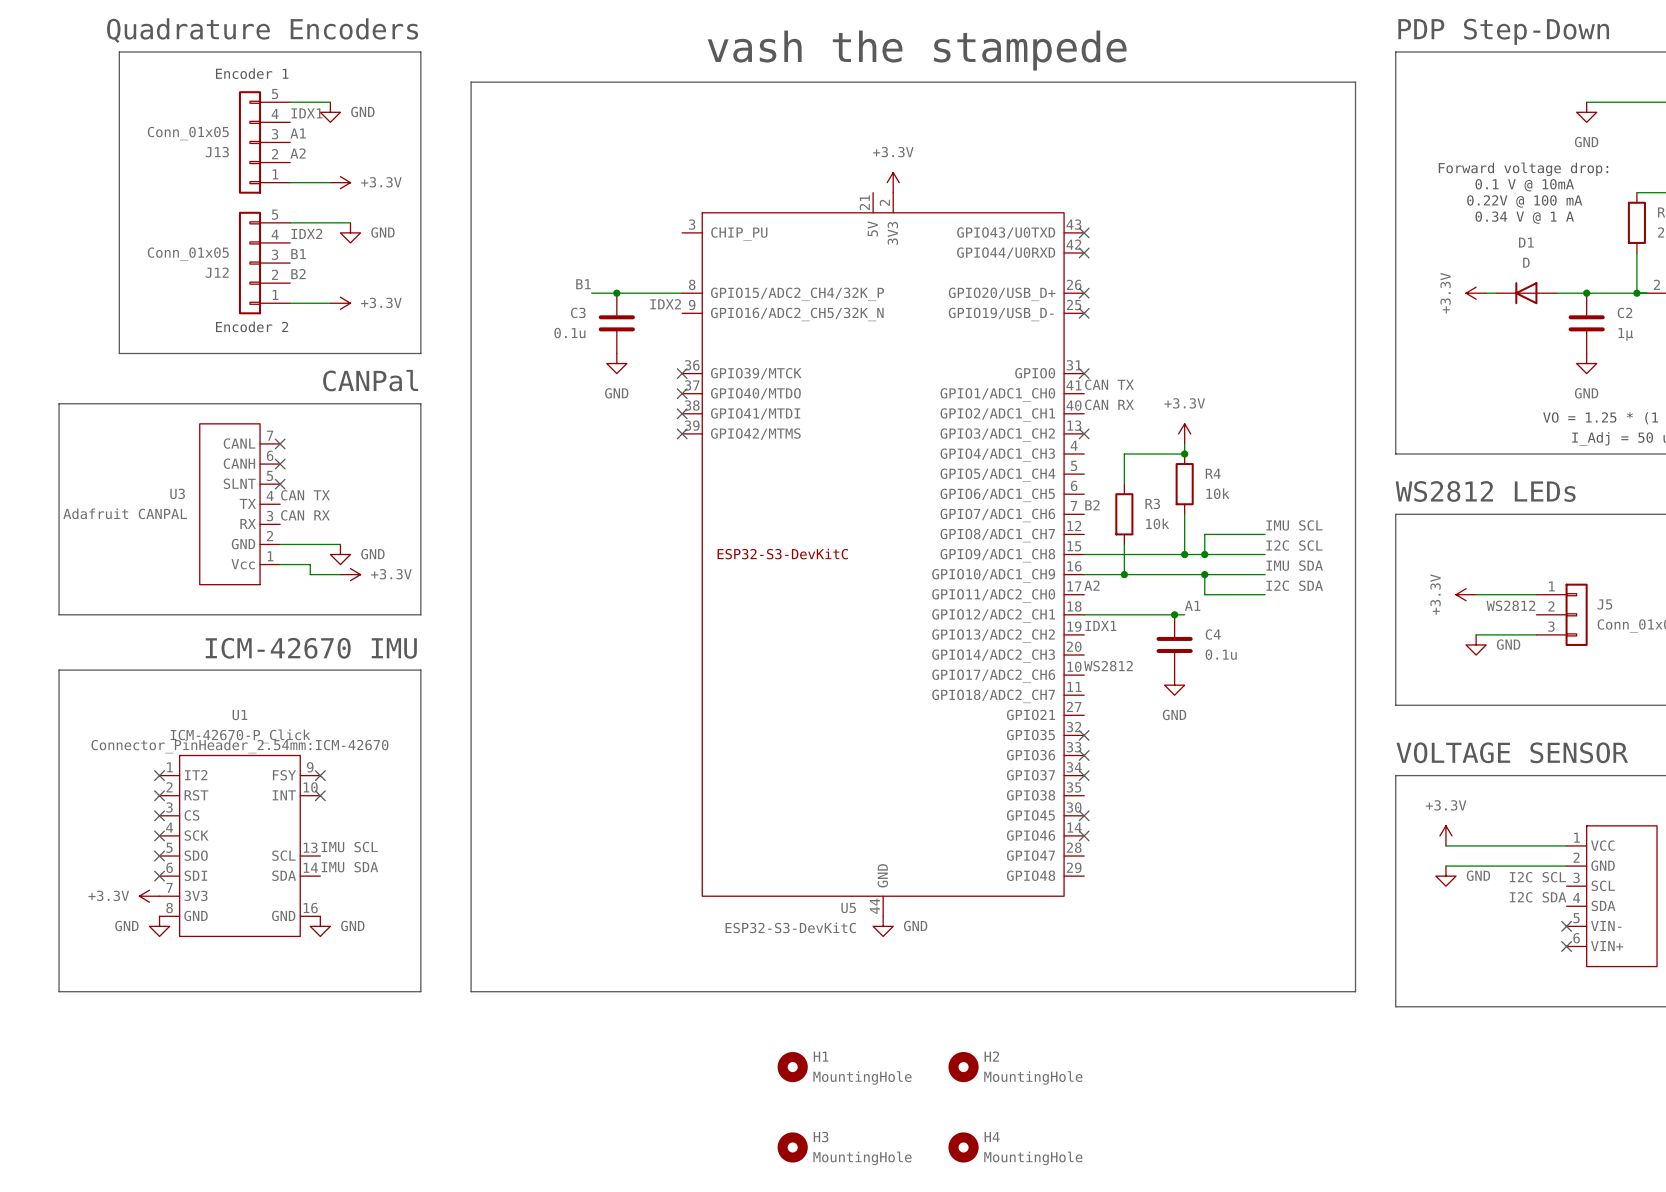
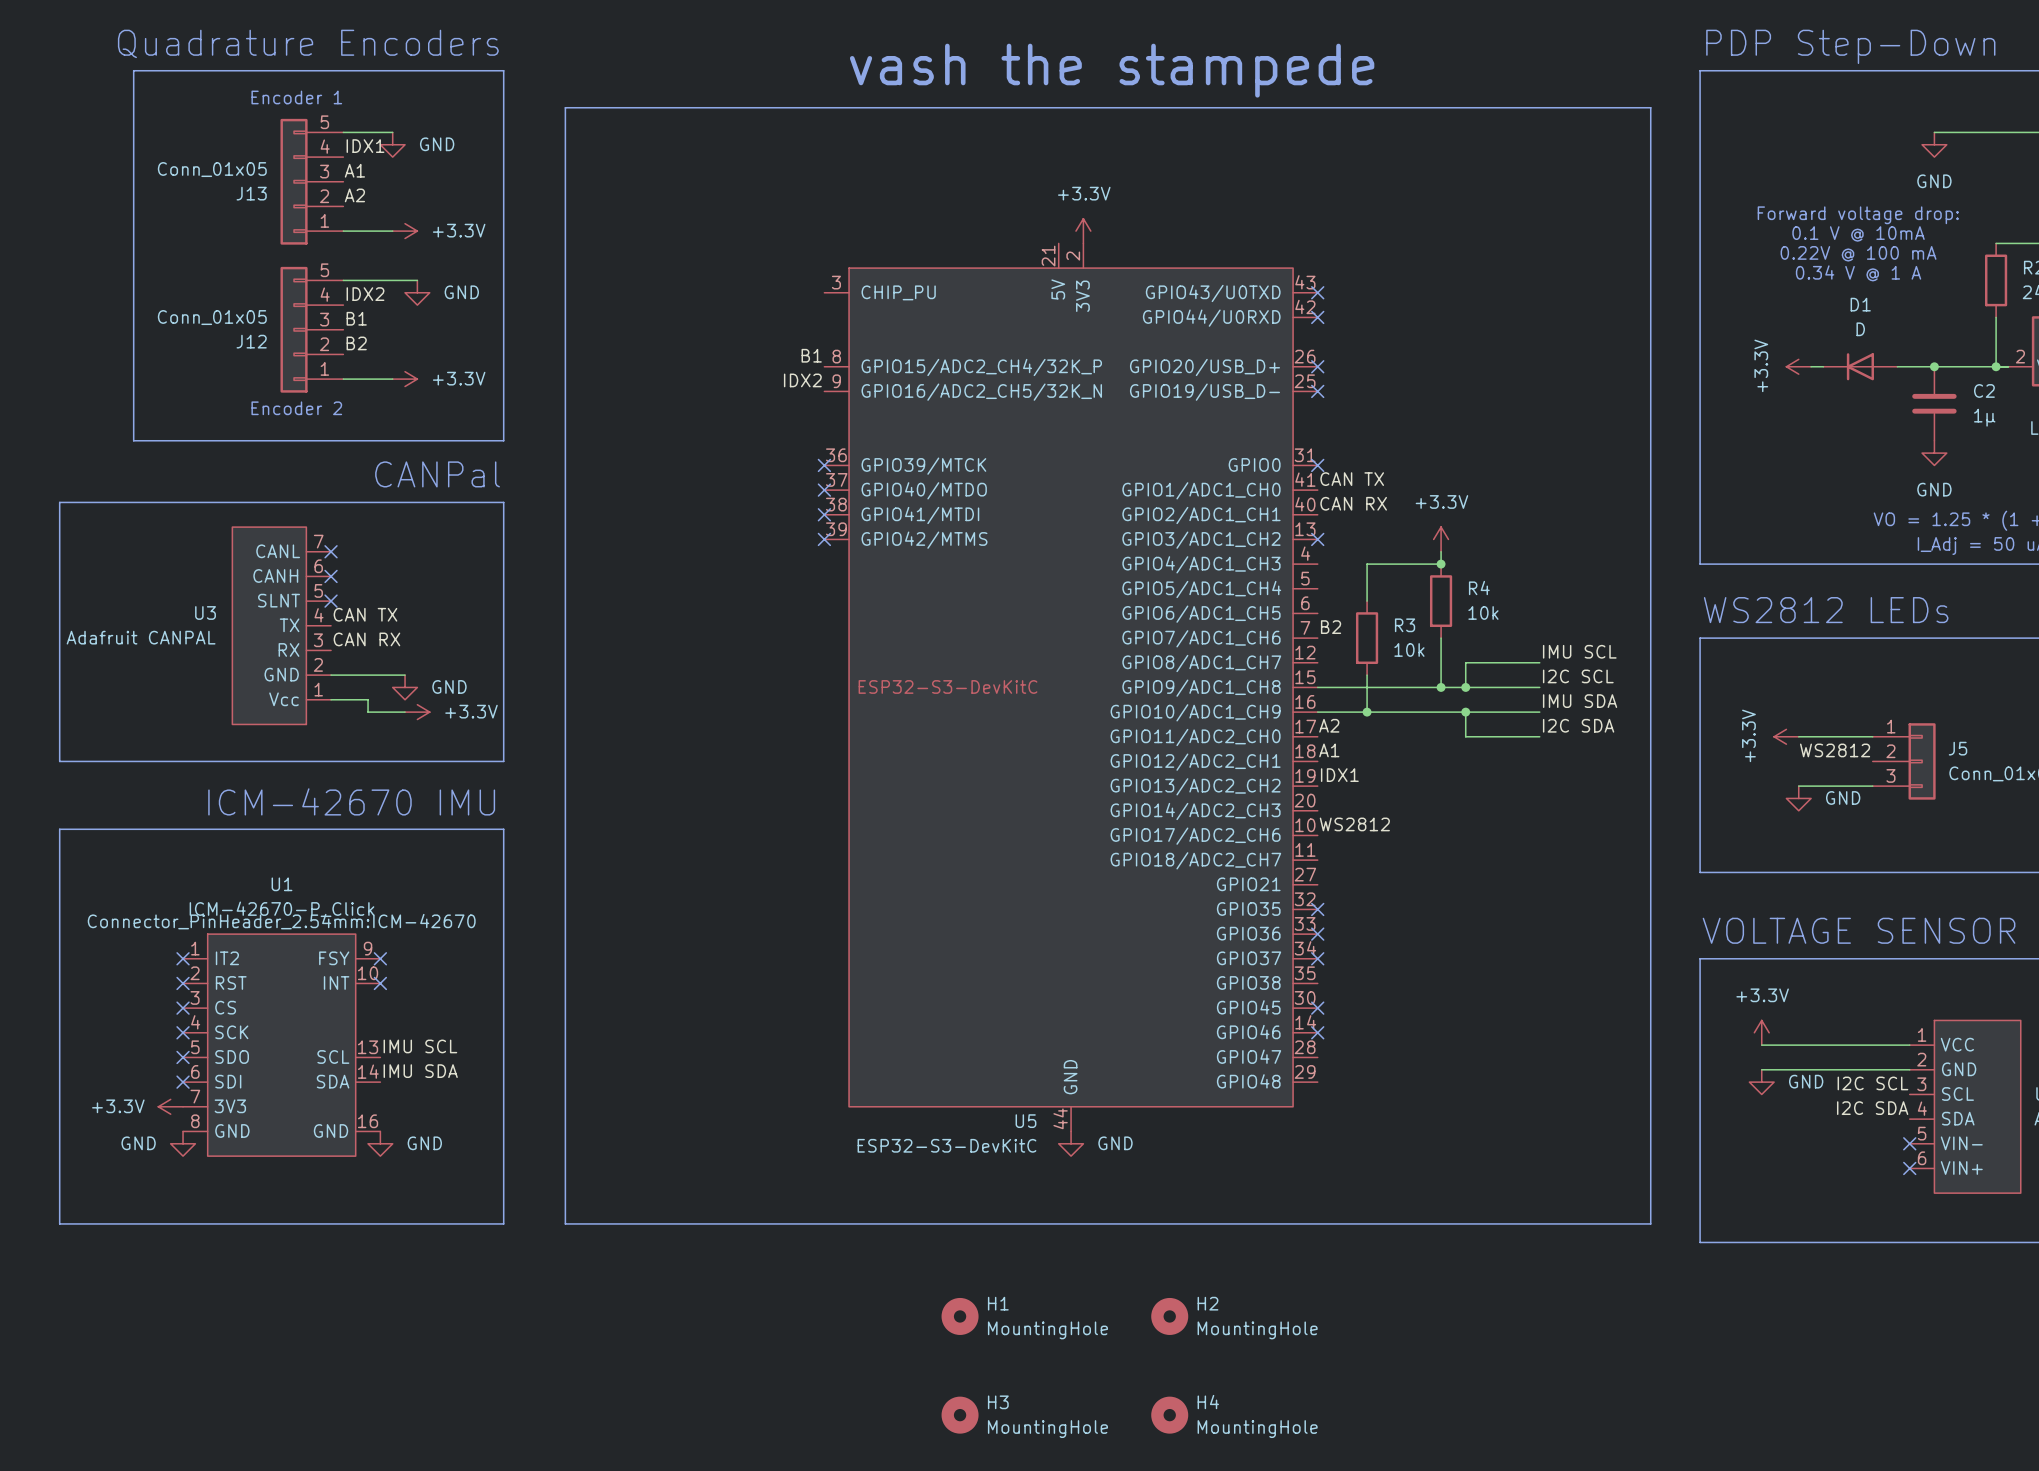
label position: B1 (583, 284) -> B1 (811, 355)
wire: (591, 293) (682, 293) -> none
junction: (616, 293) -> none
C3: 0.1u (616, 323) -> none
power symbol: GND (616, 363) -> none
label position: A1 (1192, 605) -> A1 (1329, 750)
wire: (1084, 614) (1184, 614) -> none
junction: (1174, 614) -> none
C4: 0.1u (1174, 644) -> none
power symbol: GND (1174, 685) -> none

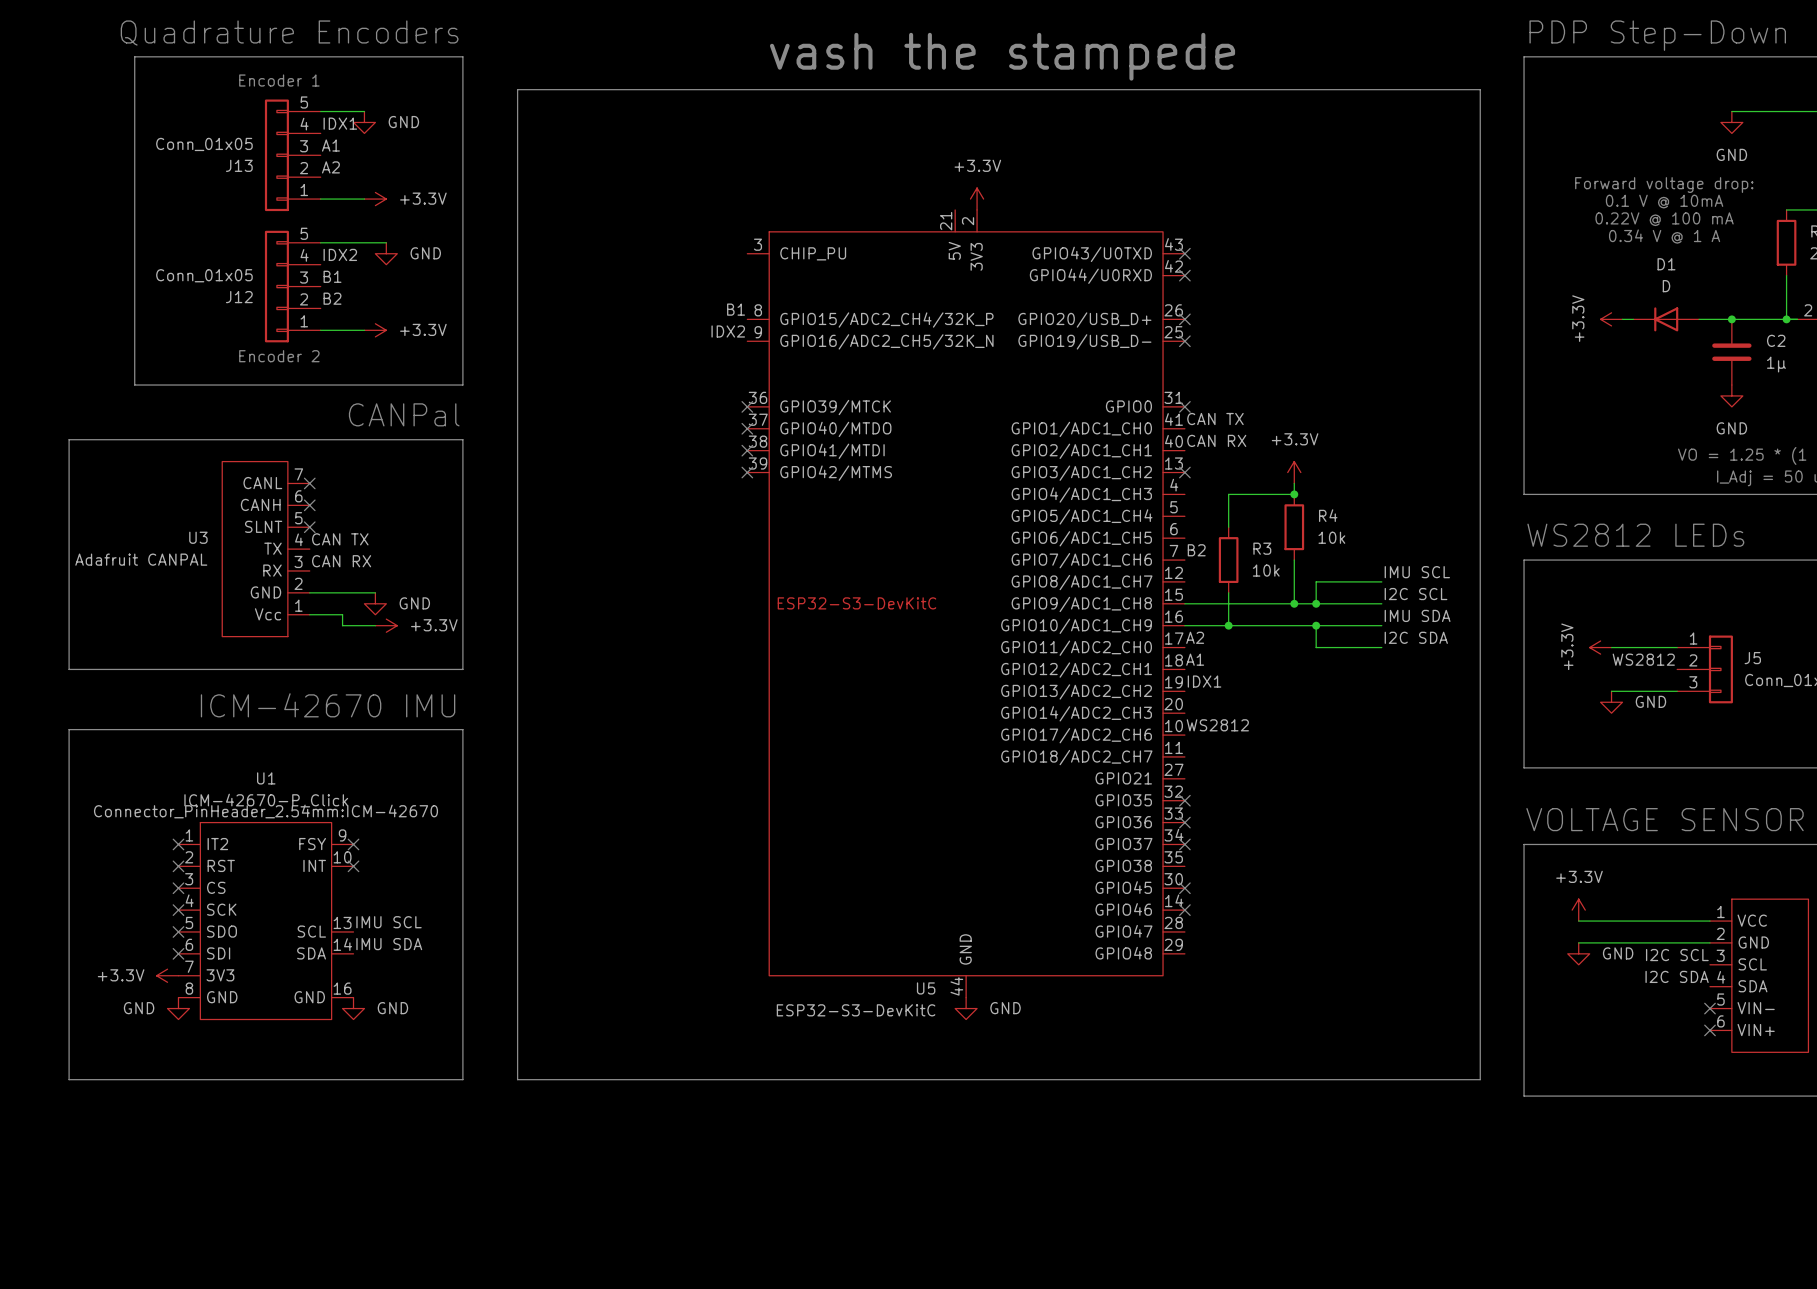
H1: MountingHole (960, 1316) -> none
H2: MountingHole (1169, 1316) -> none
H3: MountingHole (960, 1415) -> none
H4: MountingHole (1169, 1415) -> none

